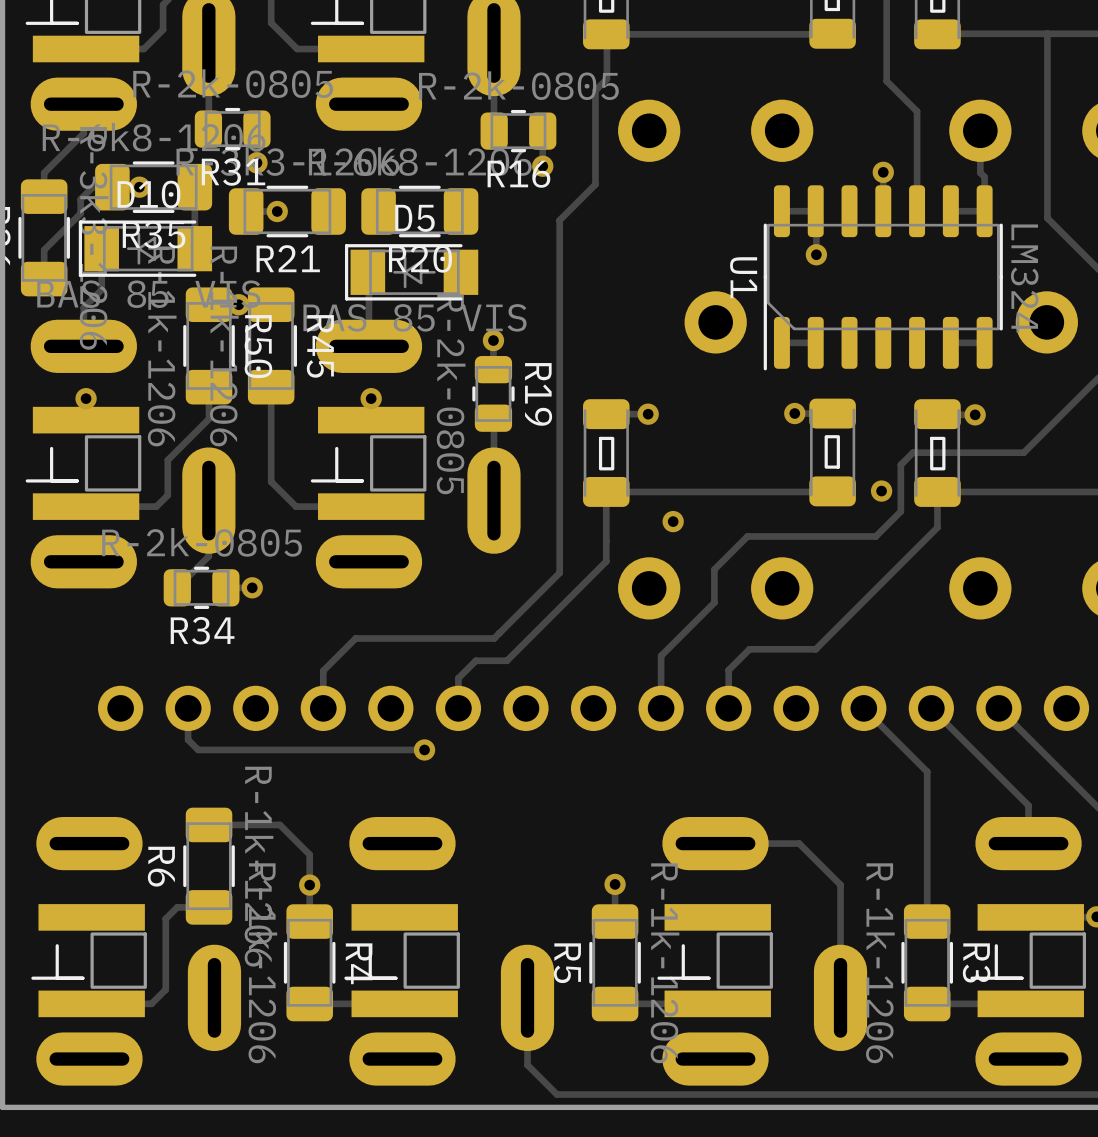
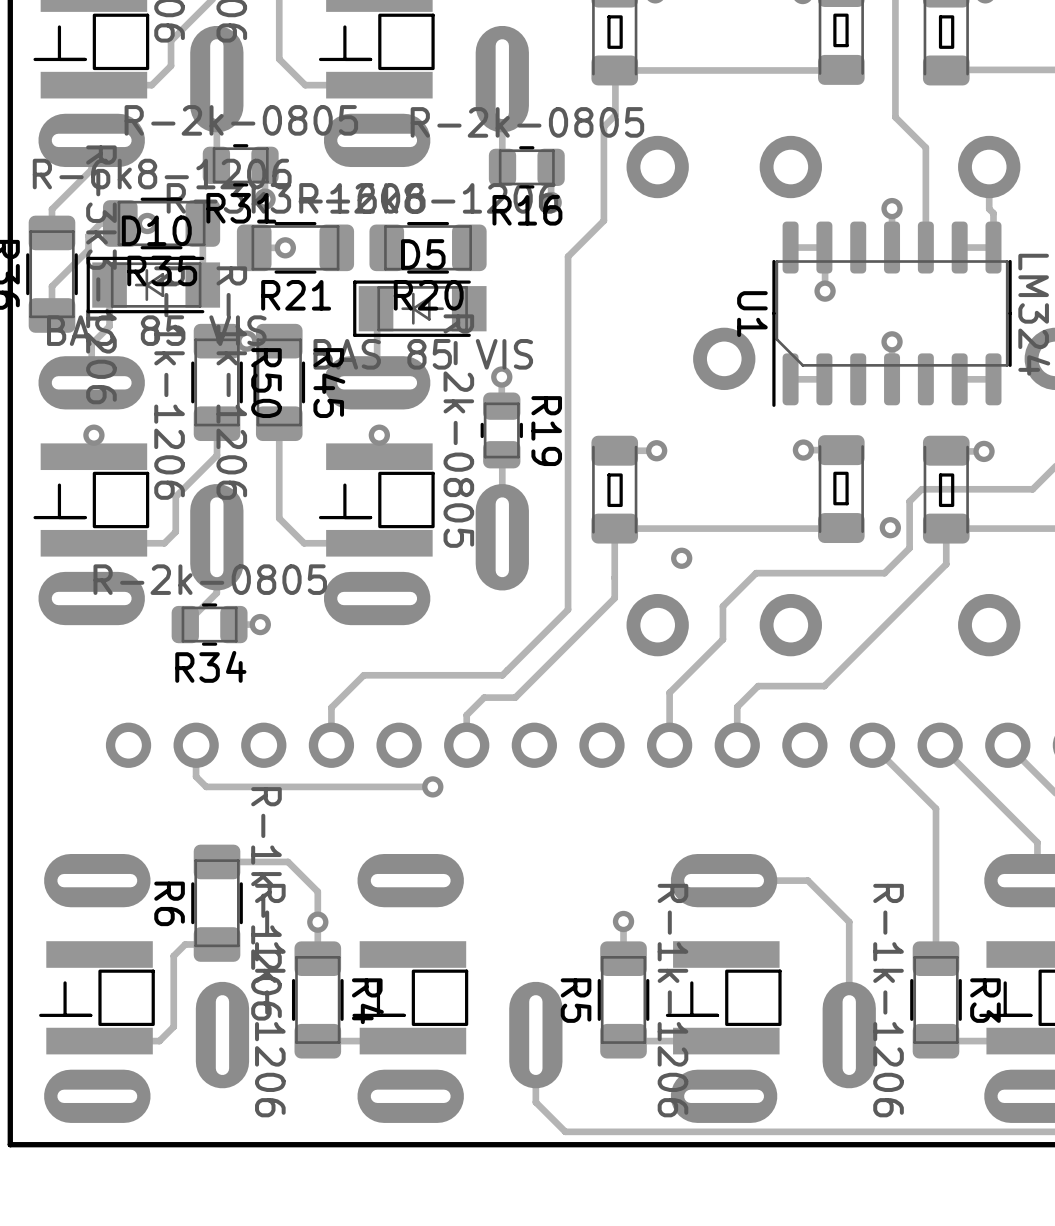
via: none -> (892, 341)

